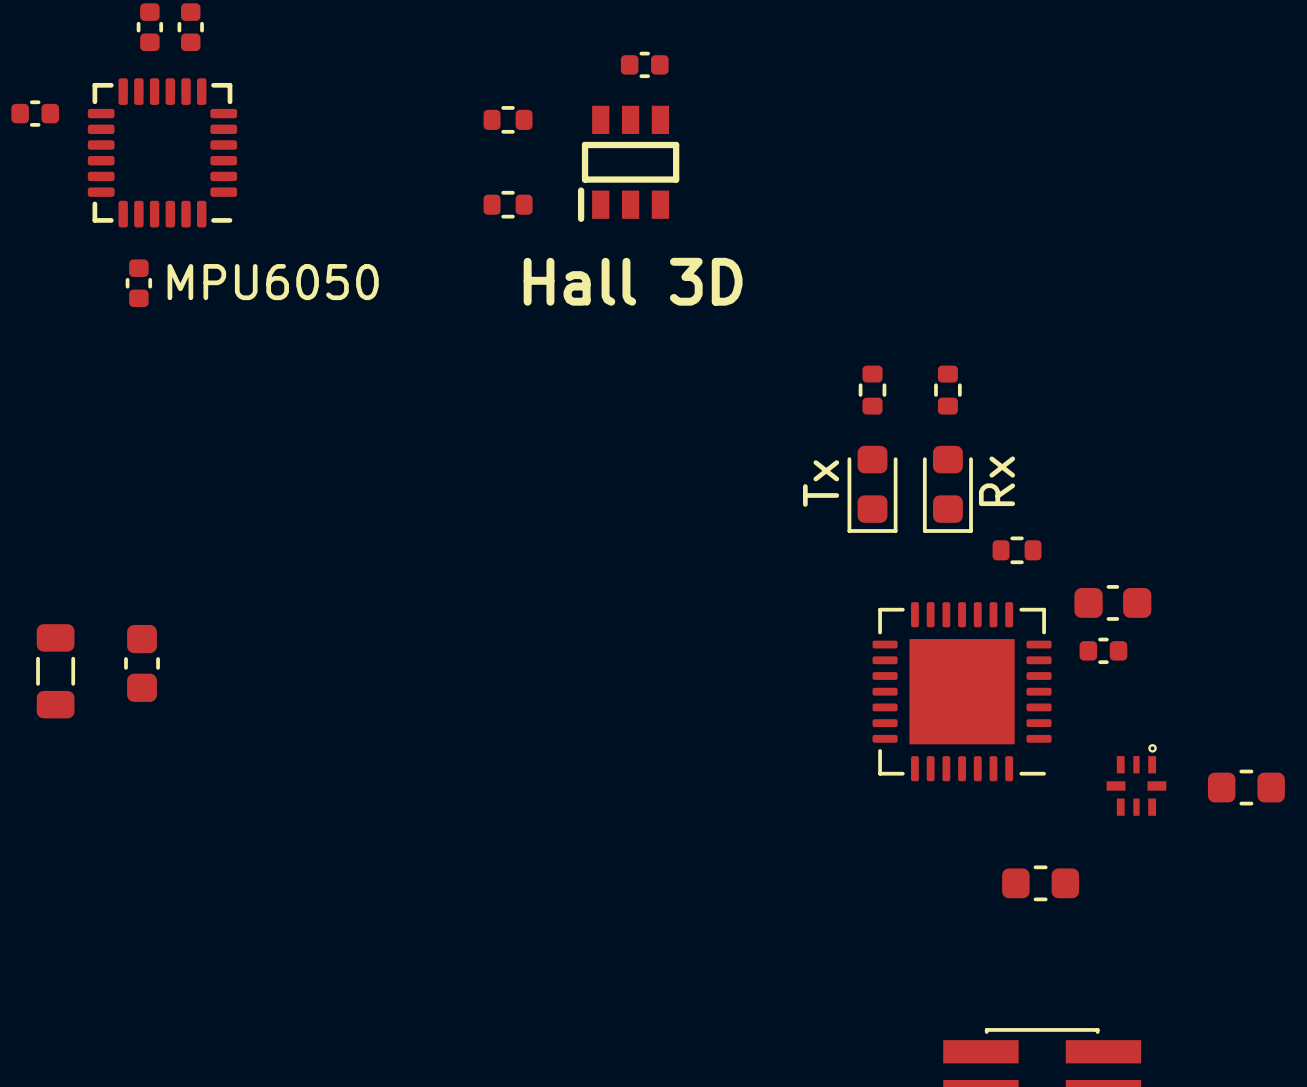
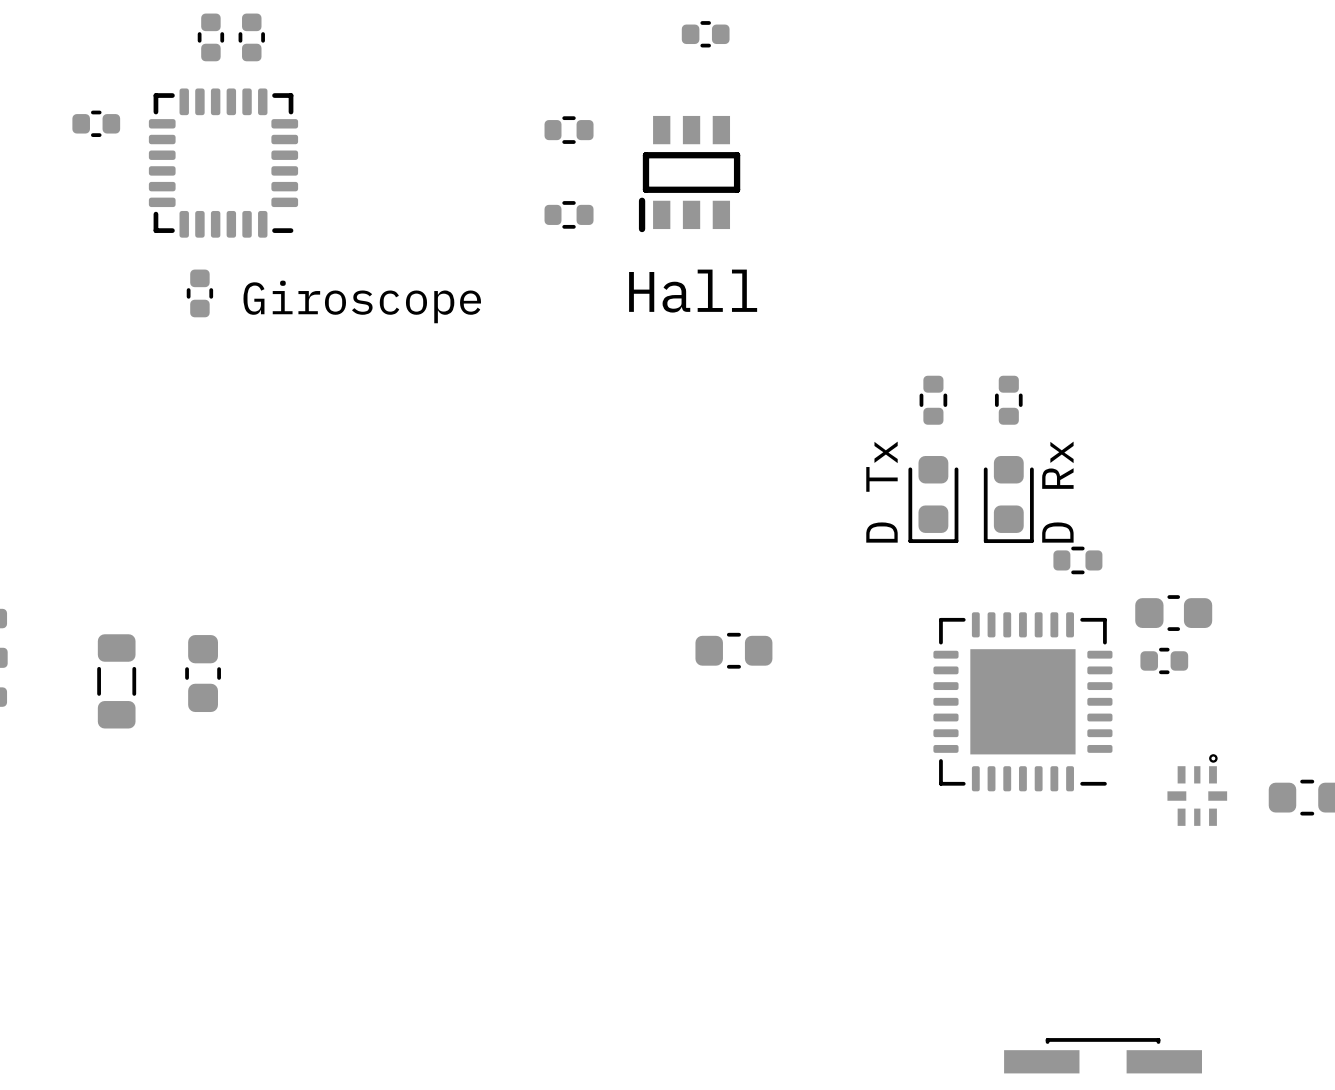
part position: (644, 64) -> (705, 34)
Hall 3D name: Hall 3D (633, 281) -> Hall (693, 291)
MPU6050 name: MPU6050 (273, 282) -> Giroscope (362, 301)
Rx name: Rx (997, 481) -> D Rx (1057, 492)
Tx name: Tx (821, 483) -> D Tx (881, 492)
part position: (1040, 883) -> (733, 650)

